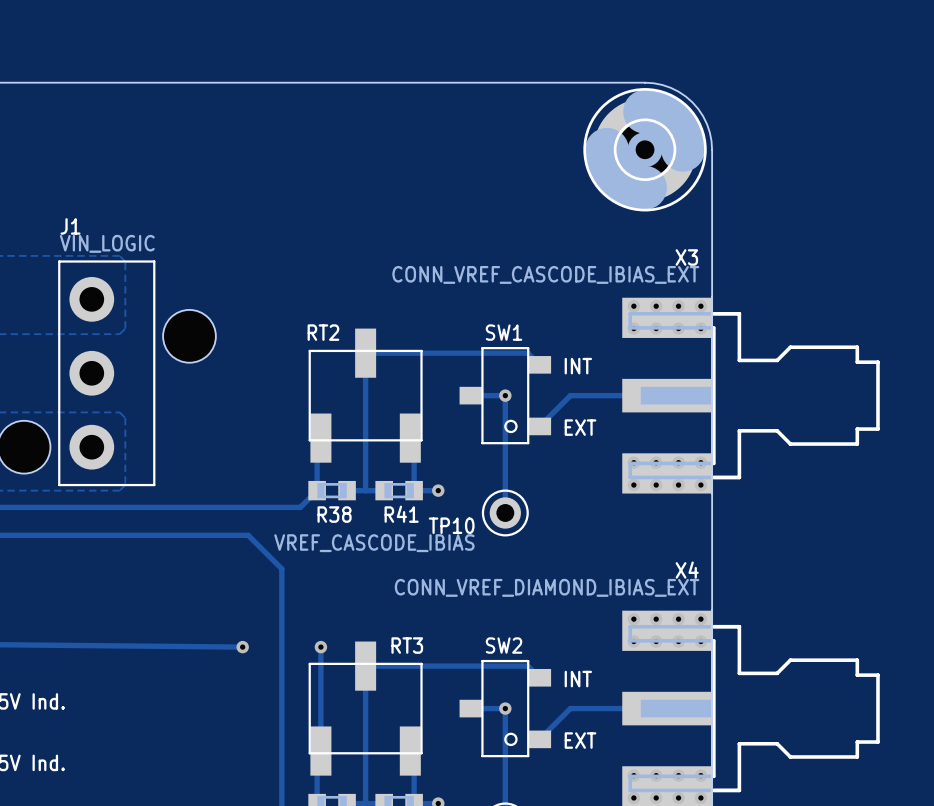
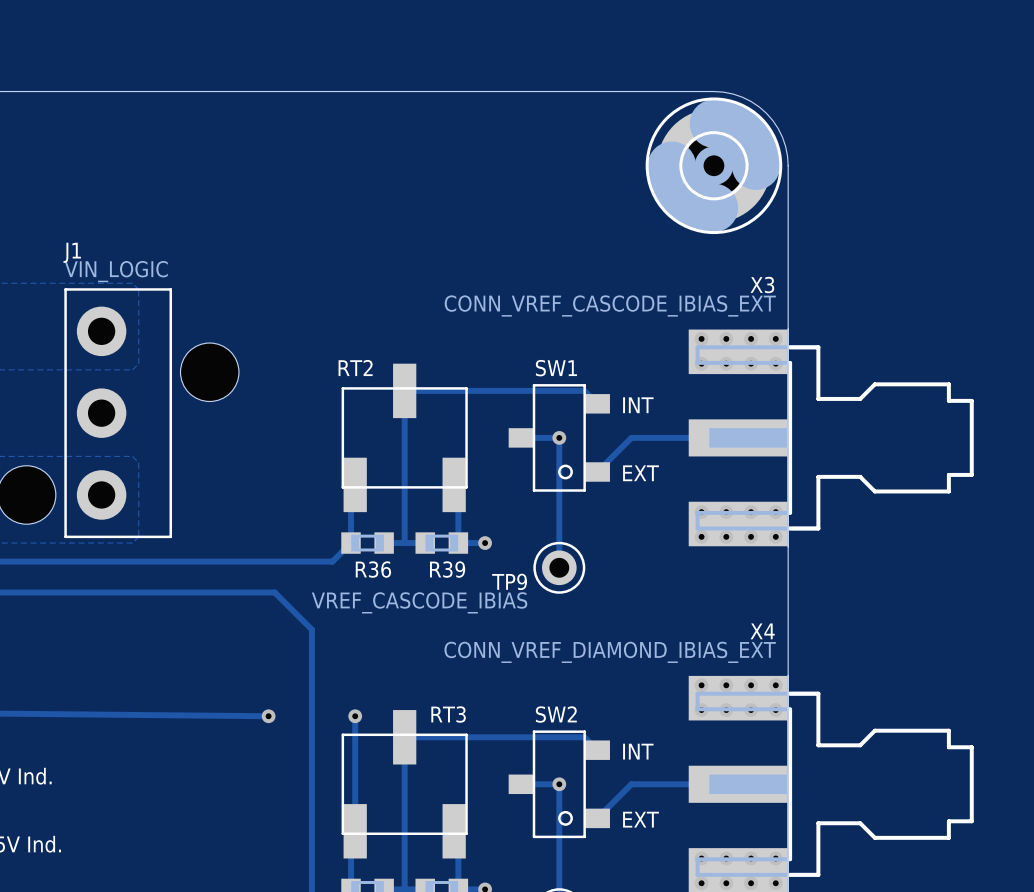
R38 name: R38 (334, 514) -> R36 (373, 569)
R41 name: R41 (401, 514) -> R39 (447, 569)
TP10 name: TP10 (451, 525) -> TP9 (509, 581)

